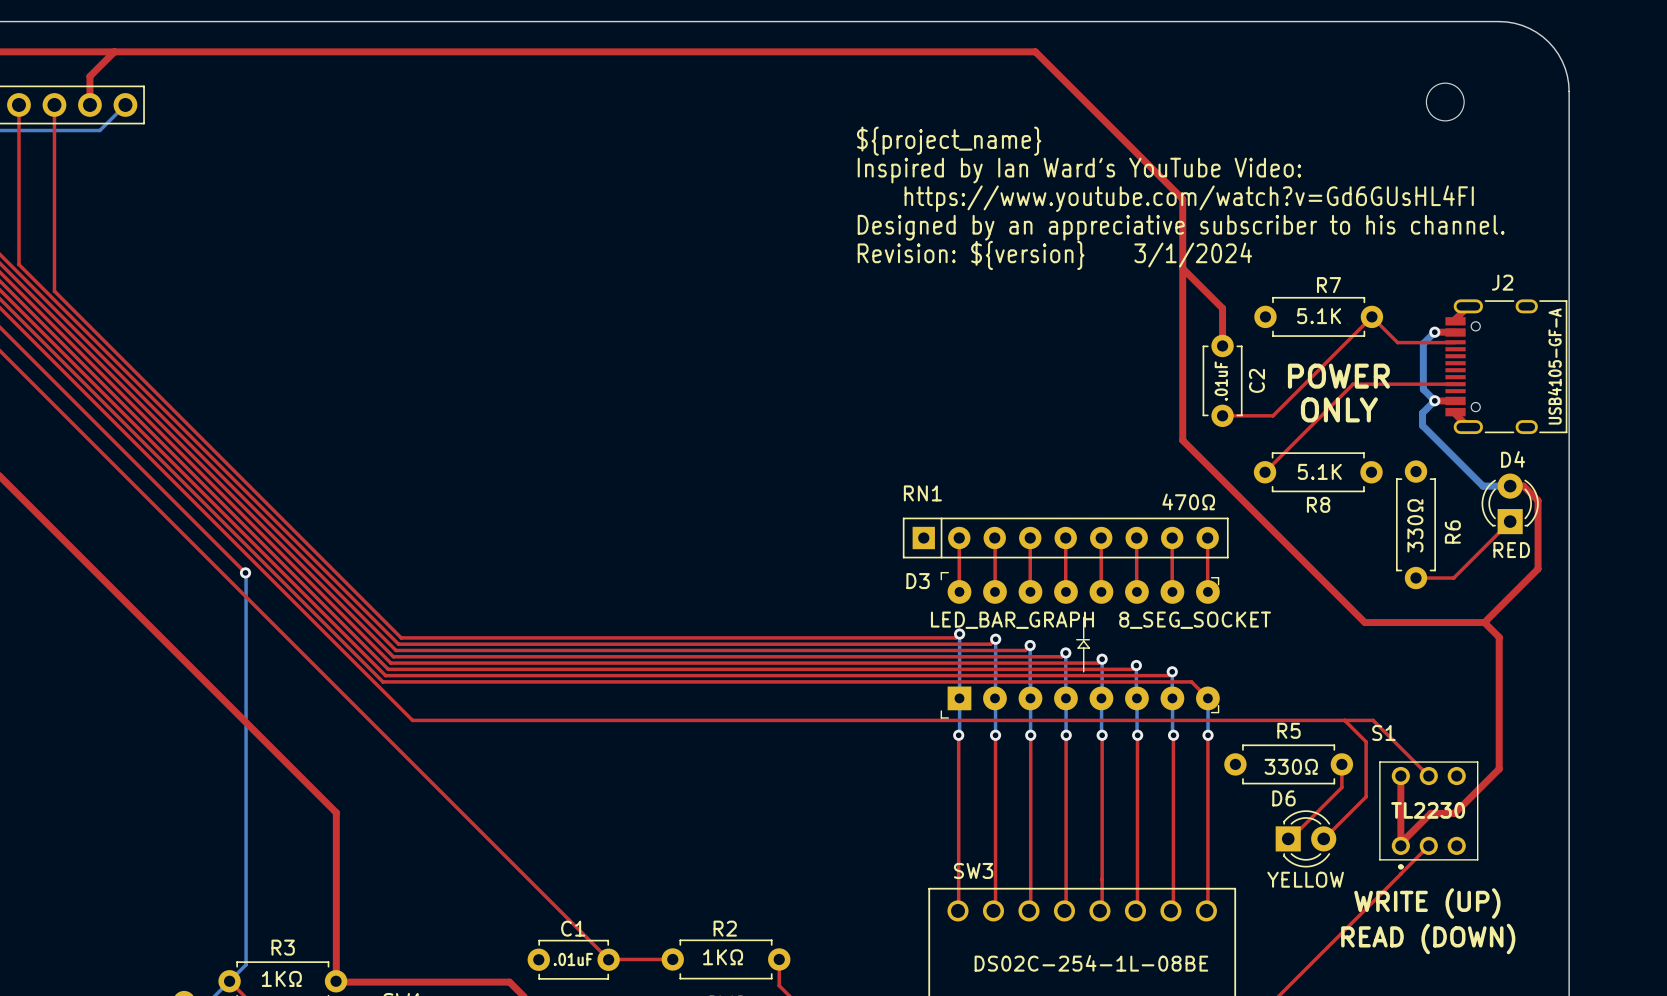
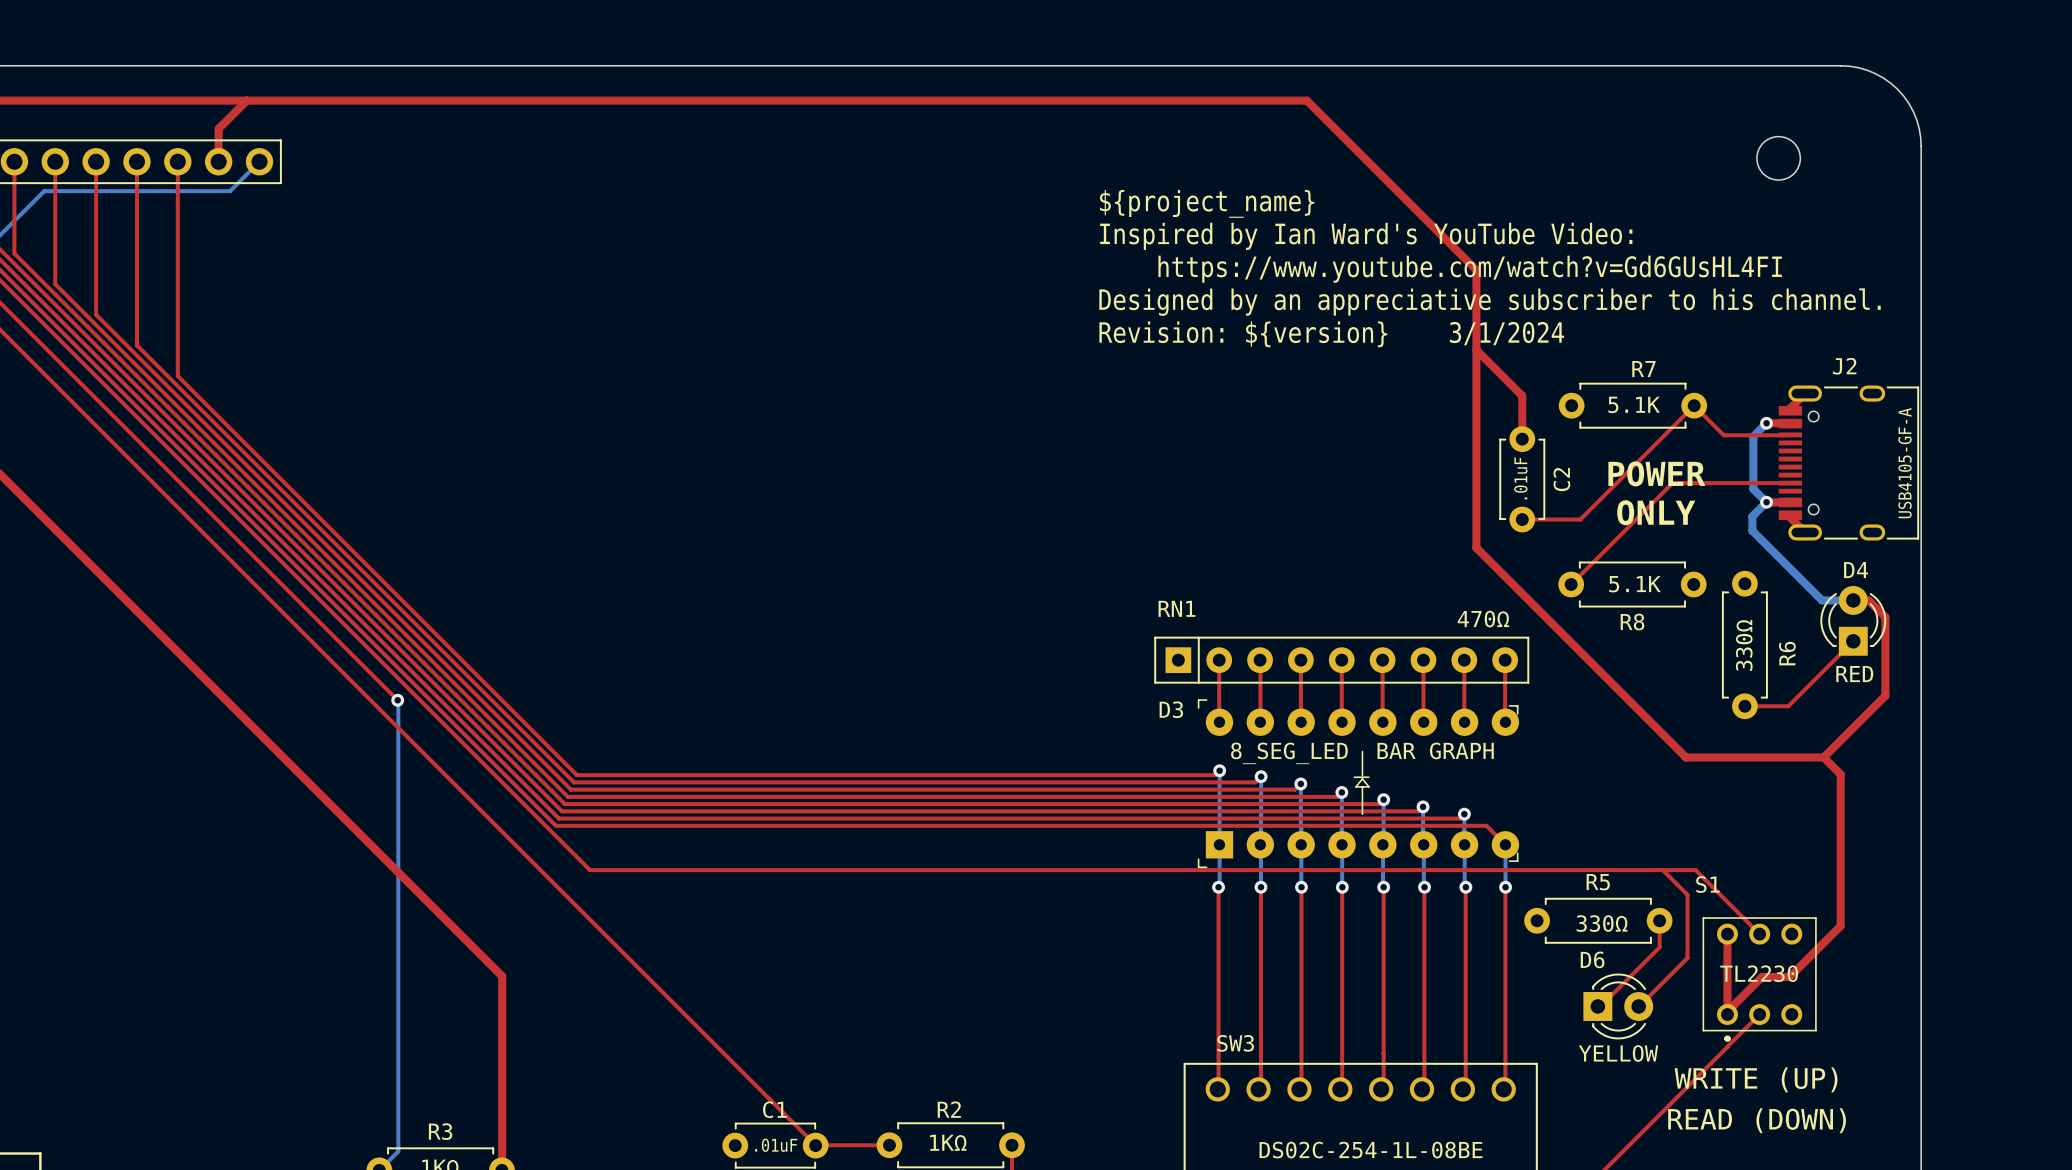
D3 value: LED_BAR_GRAPH 8_SEG_SOCKET (1100, 620) -> 8_SEG_LED BAR GRAPH (1362, 753)

